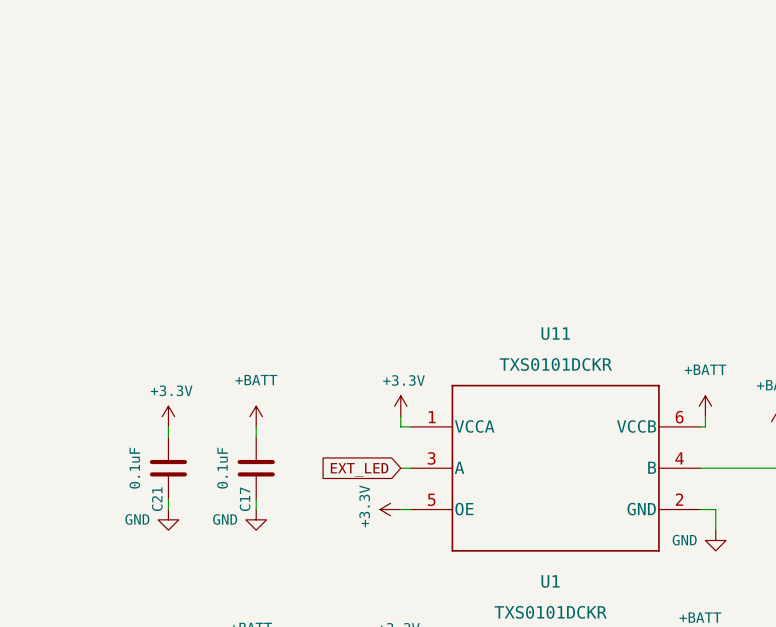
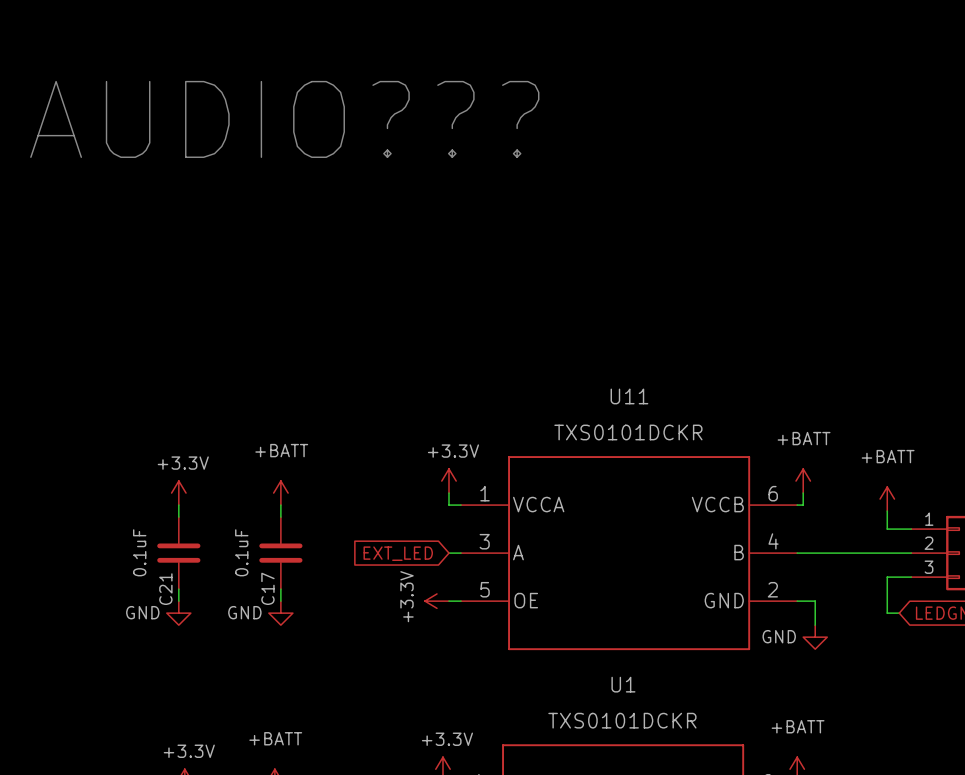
text: none -> AUDIO??? (284, 119)

